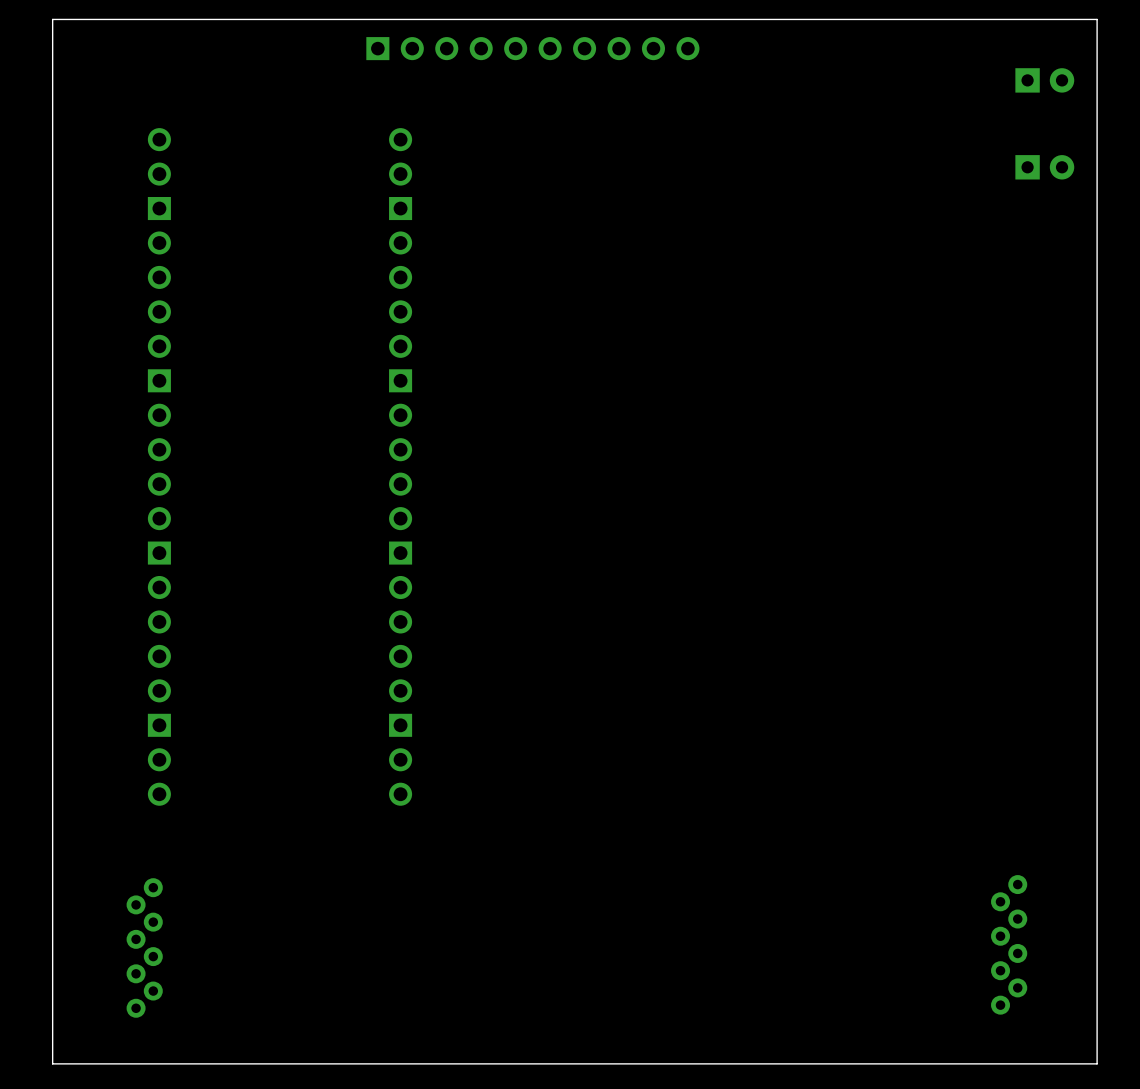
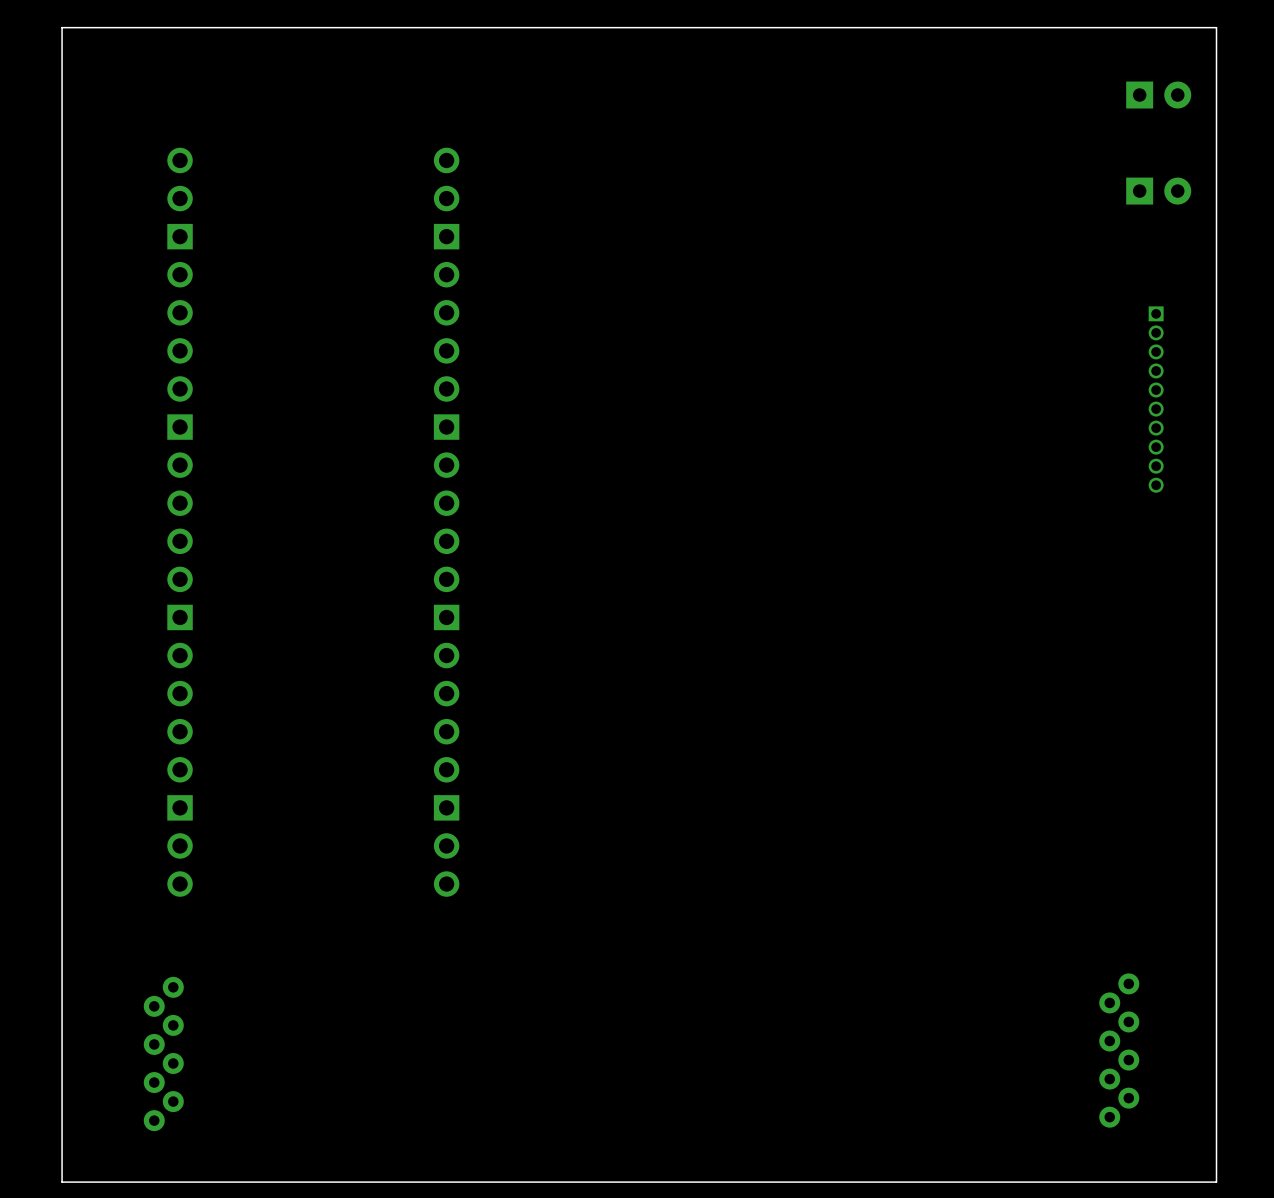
part: (532, 48) -> none
part: none -> (1156, 399)

